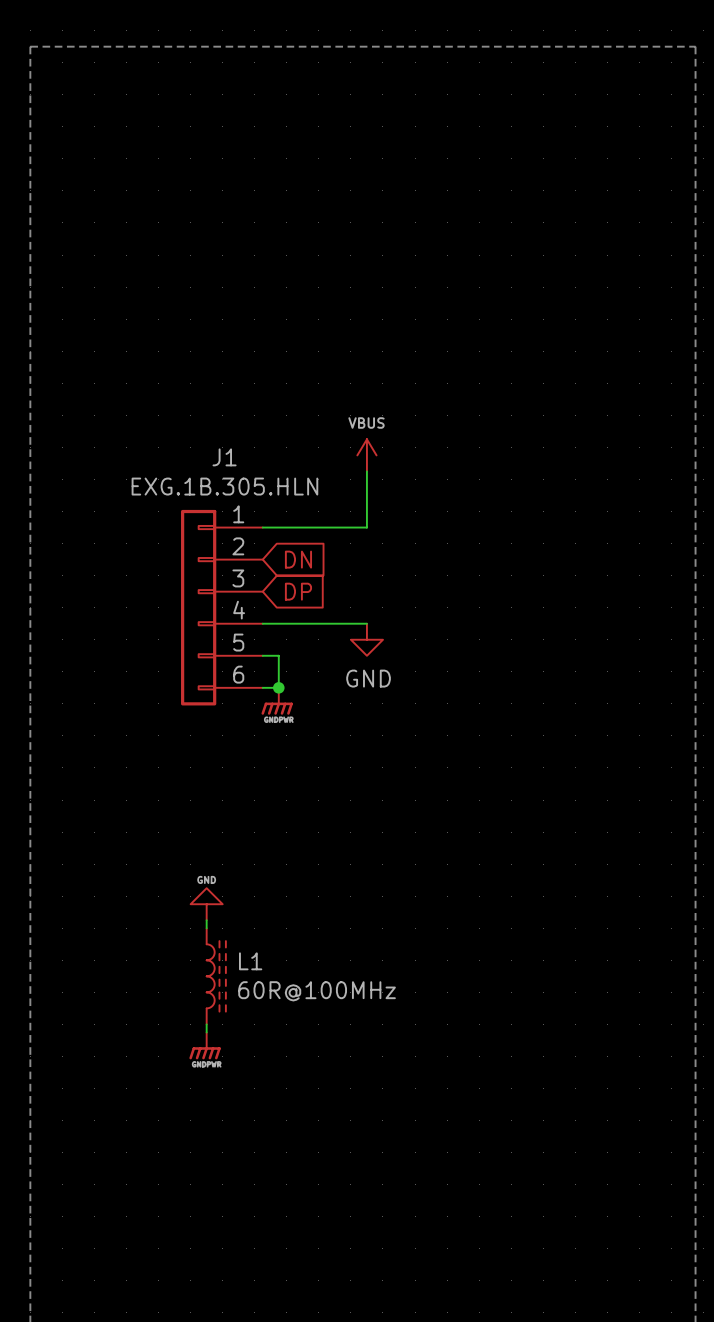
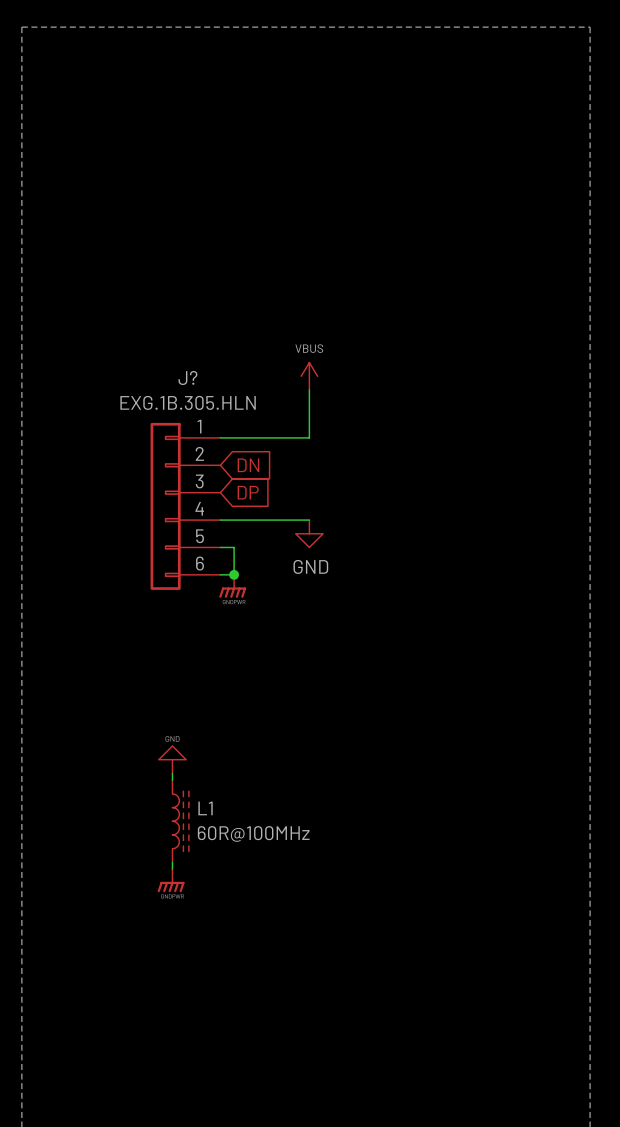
J1 name: J1 (224, 457) -> J? (187, 377)

